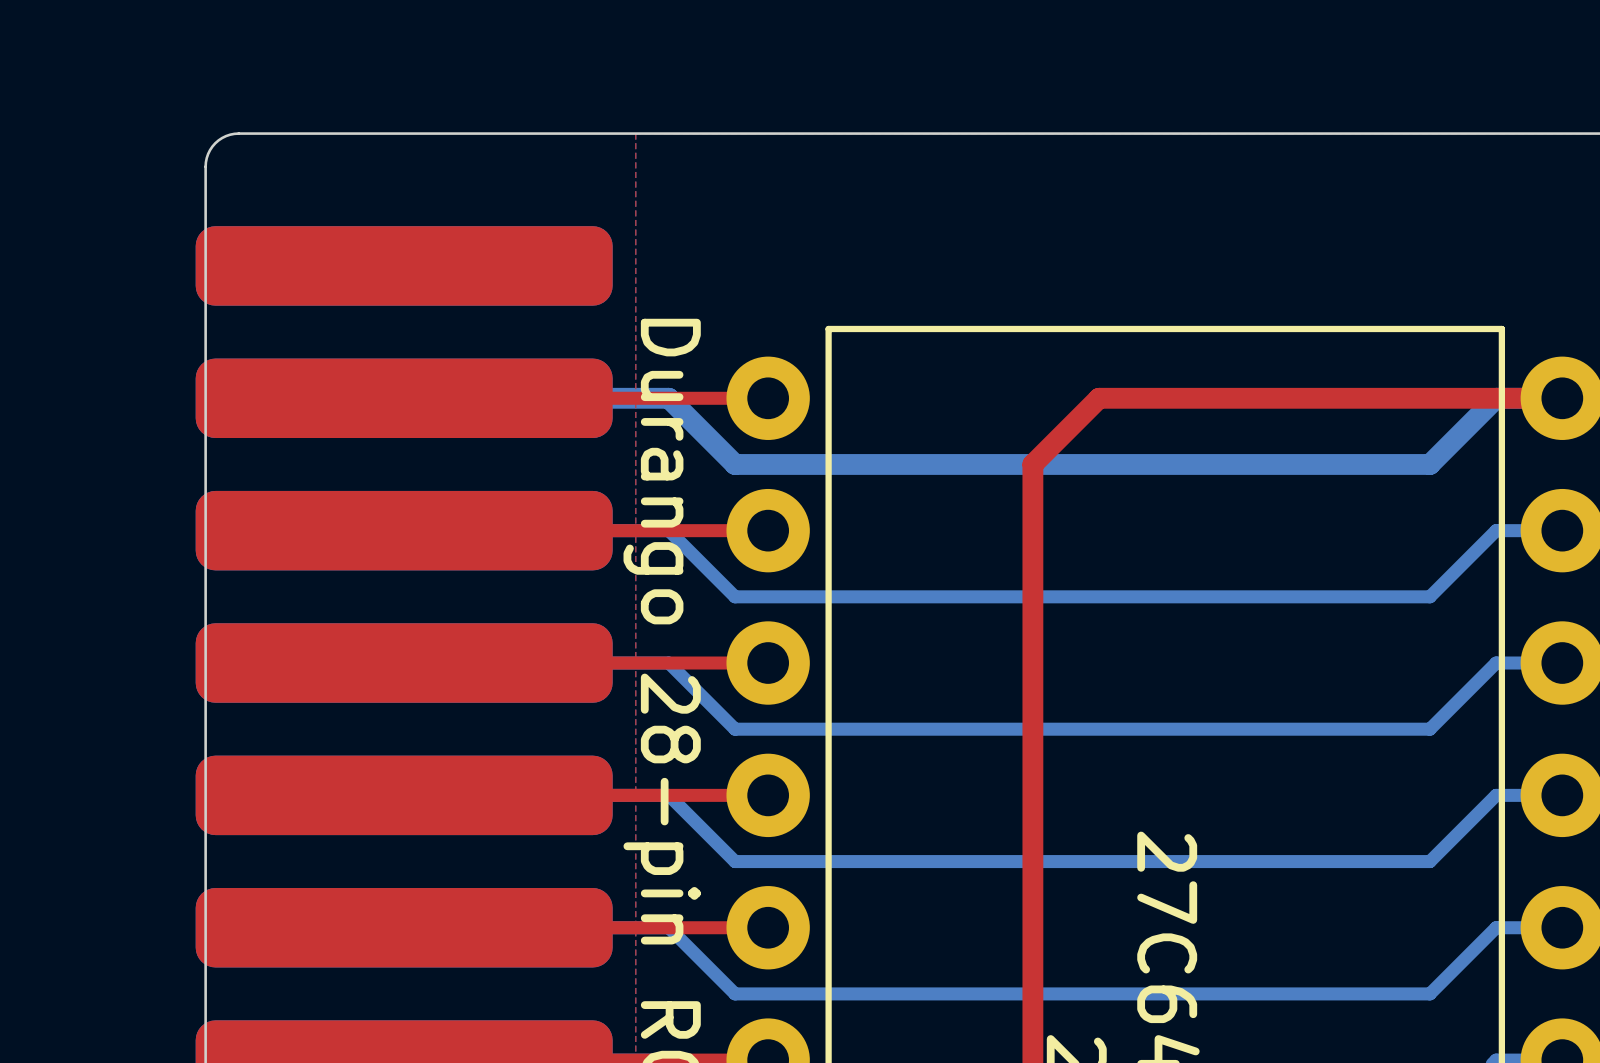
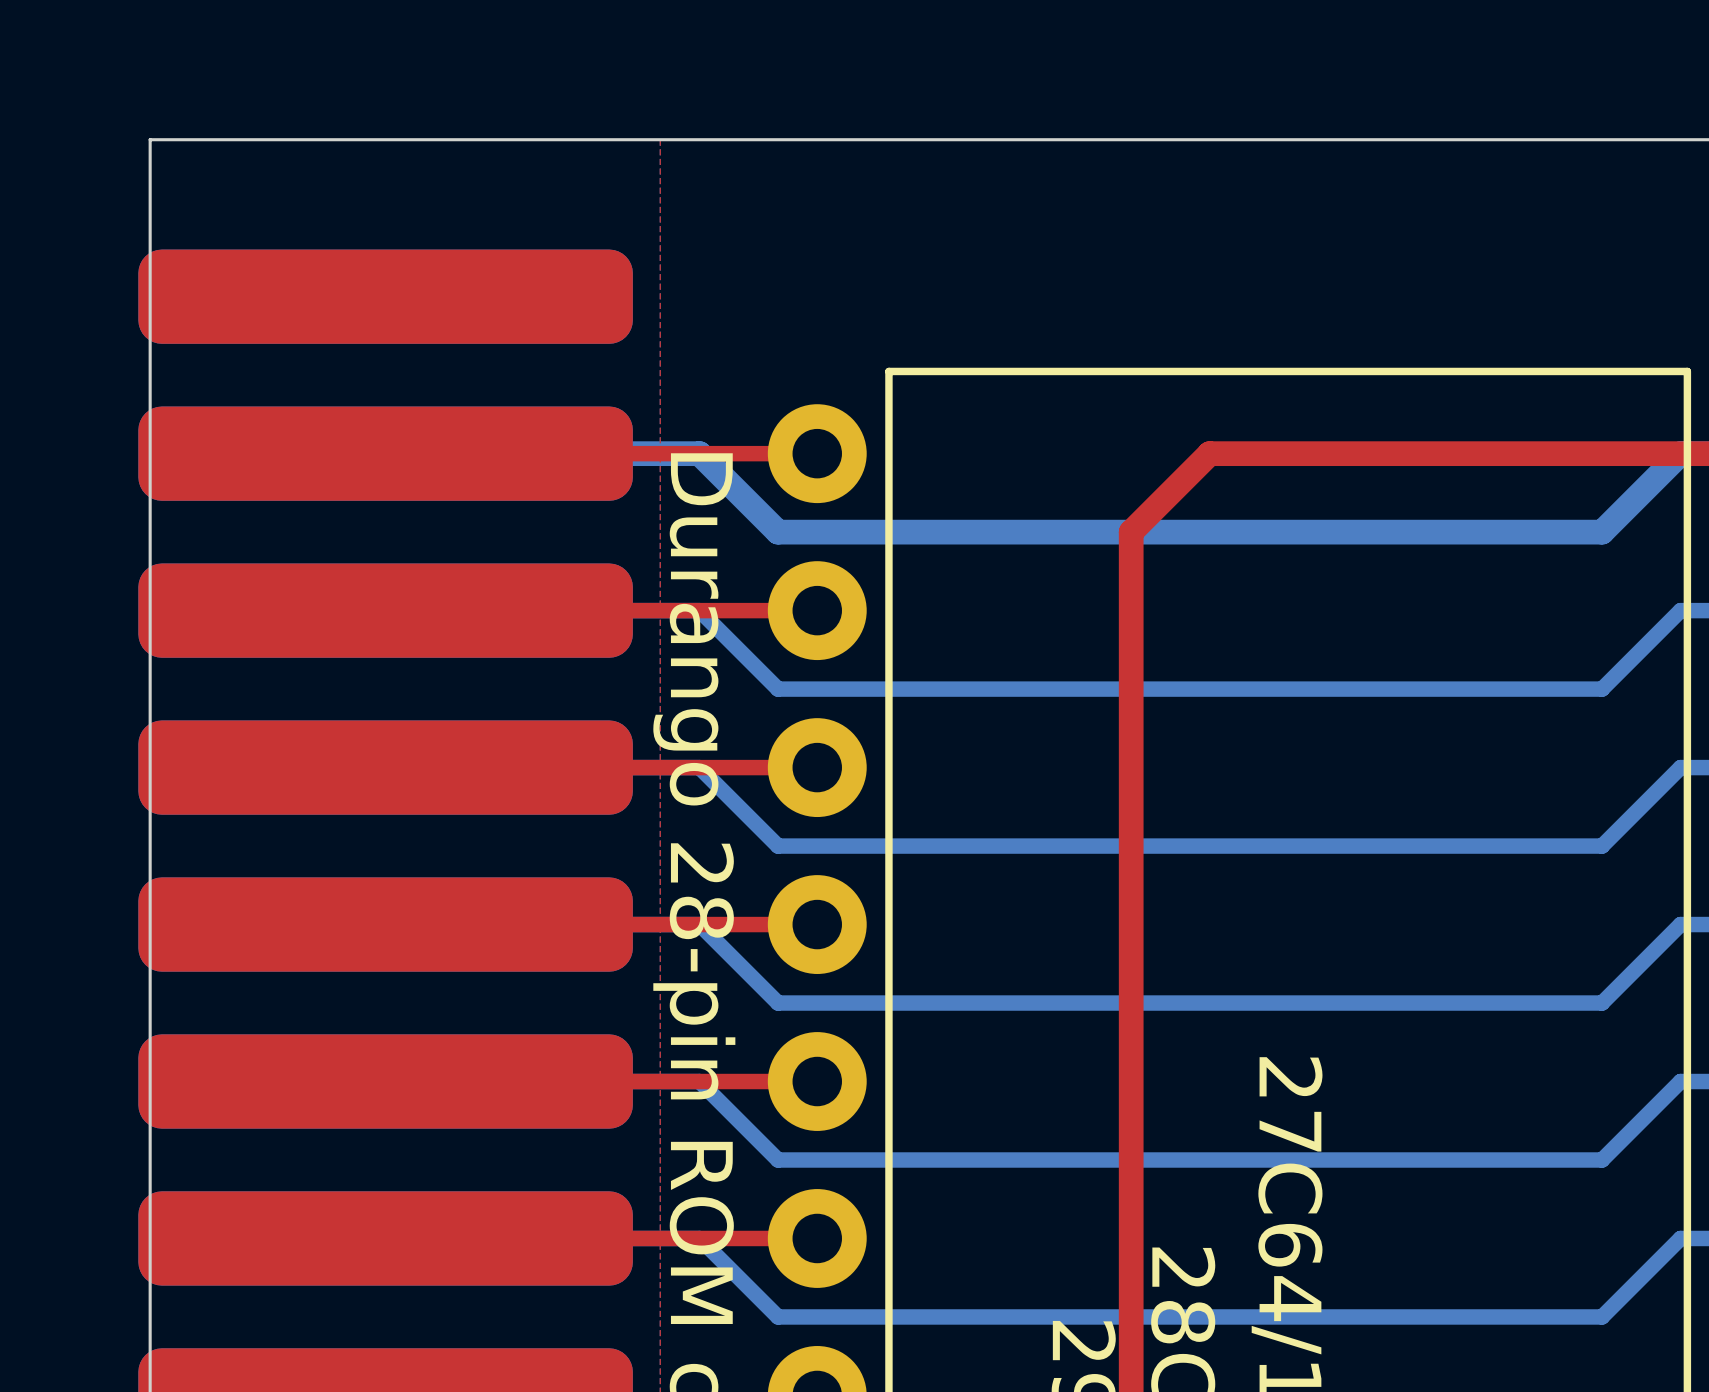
board edge: (238, 133) (226, 136) (215, 143) (208, 154) (205, 166) -> (189, 139) (150, 139) (150, 178)

